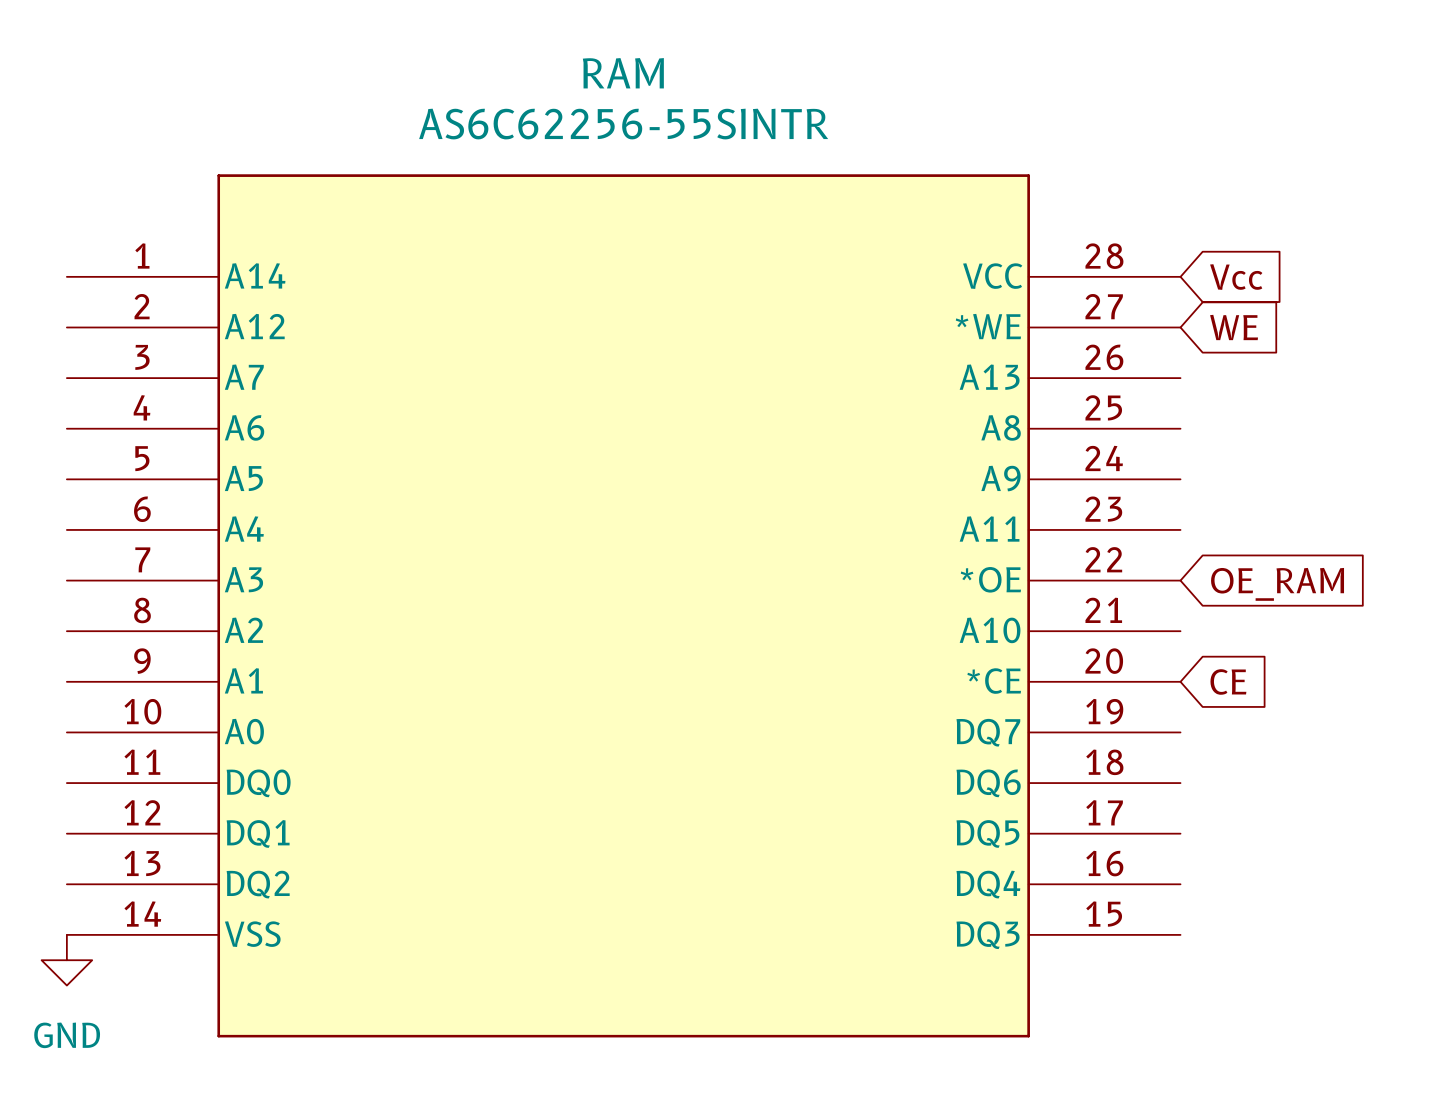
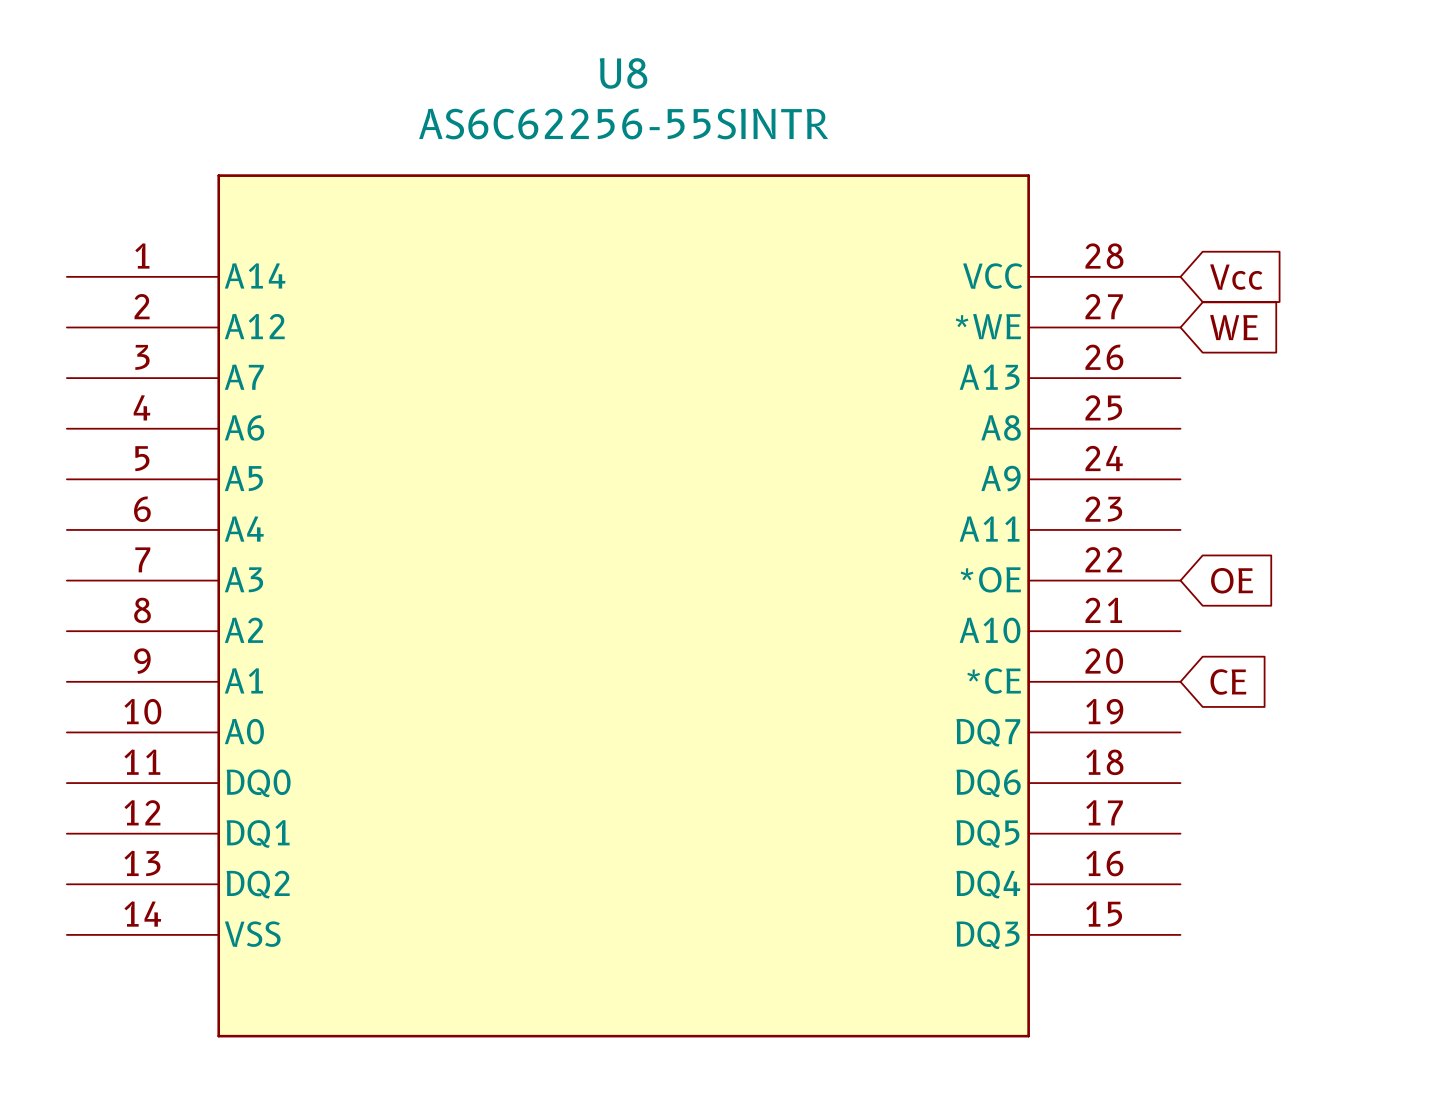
RAM name: RAM (623, 73) -> U8 (623, 73)
global label: OE_RAM (1277, 584) -> OE (1232, 580)
power symbol: GND (66, 960) -> none

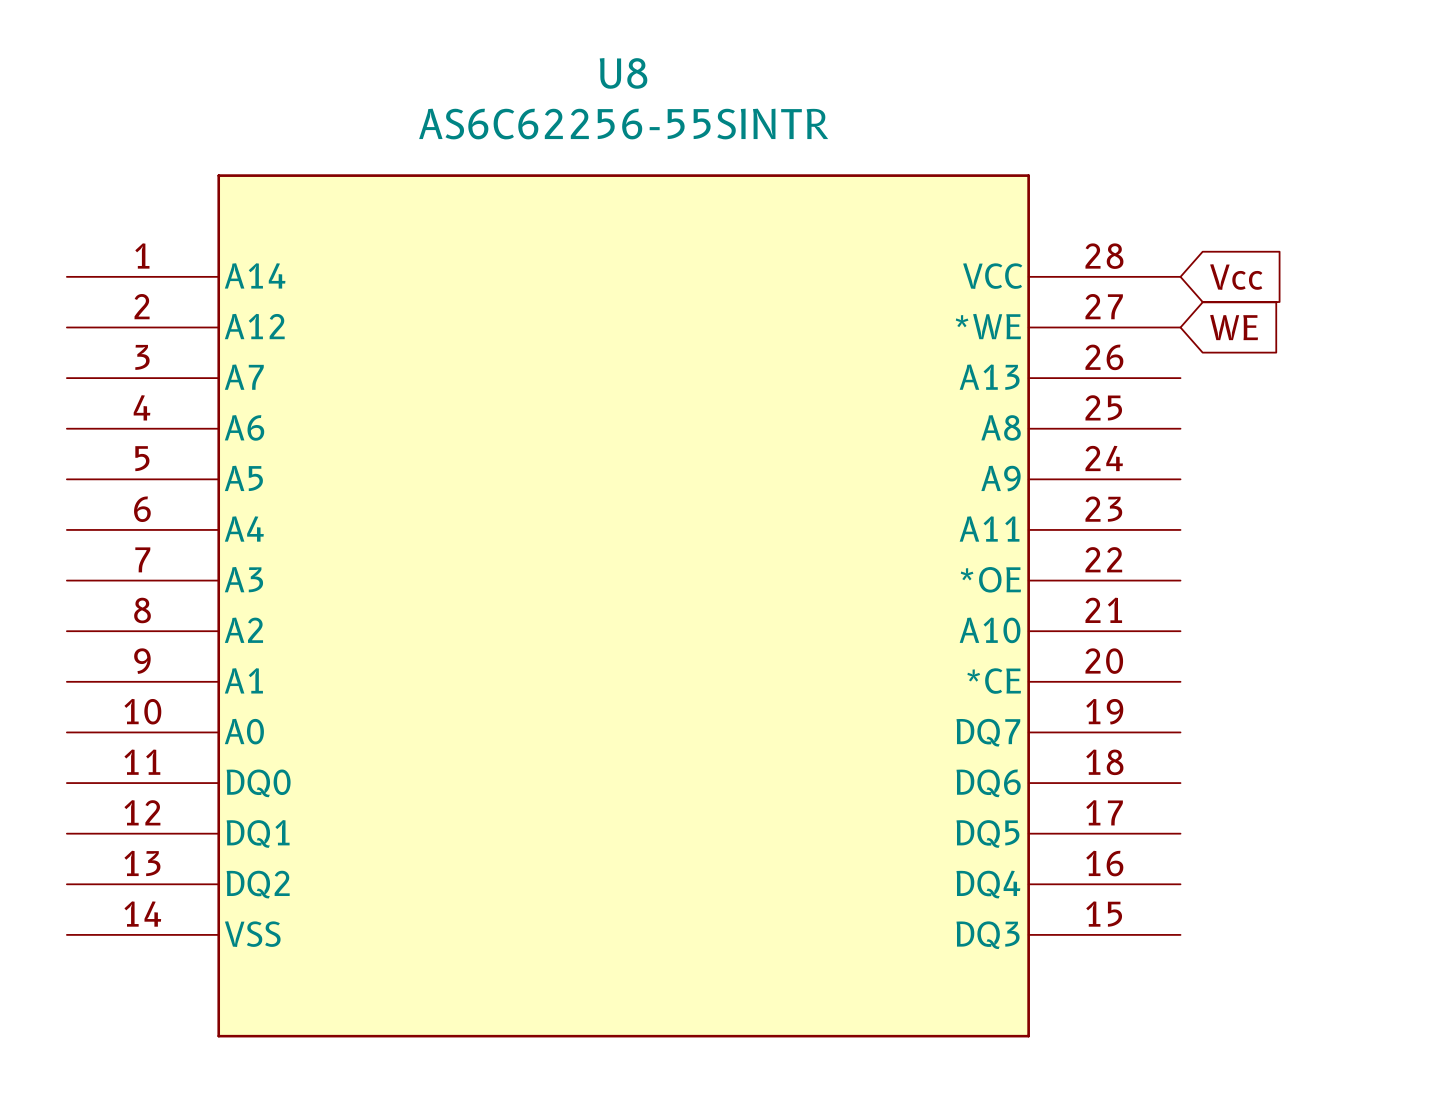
global label: OE (1232, 580) -> none
global label: CE (1228, 681) -> none

